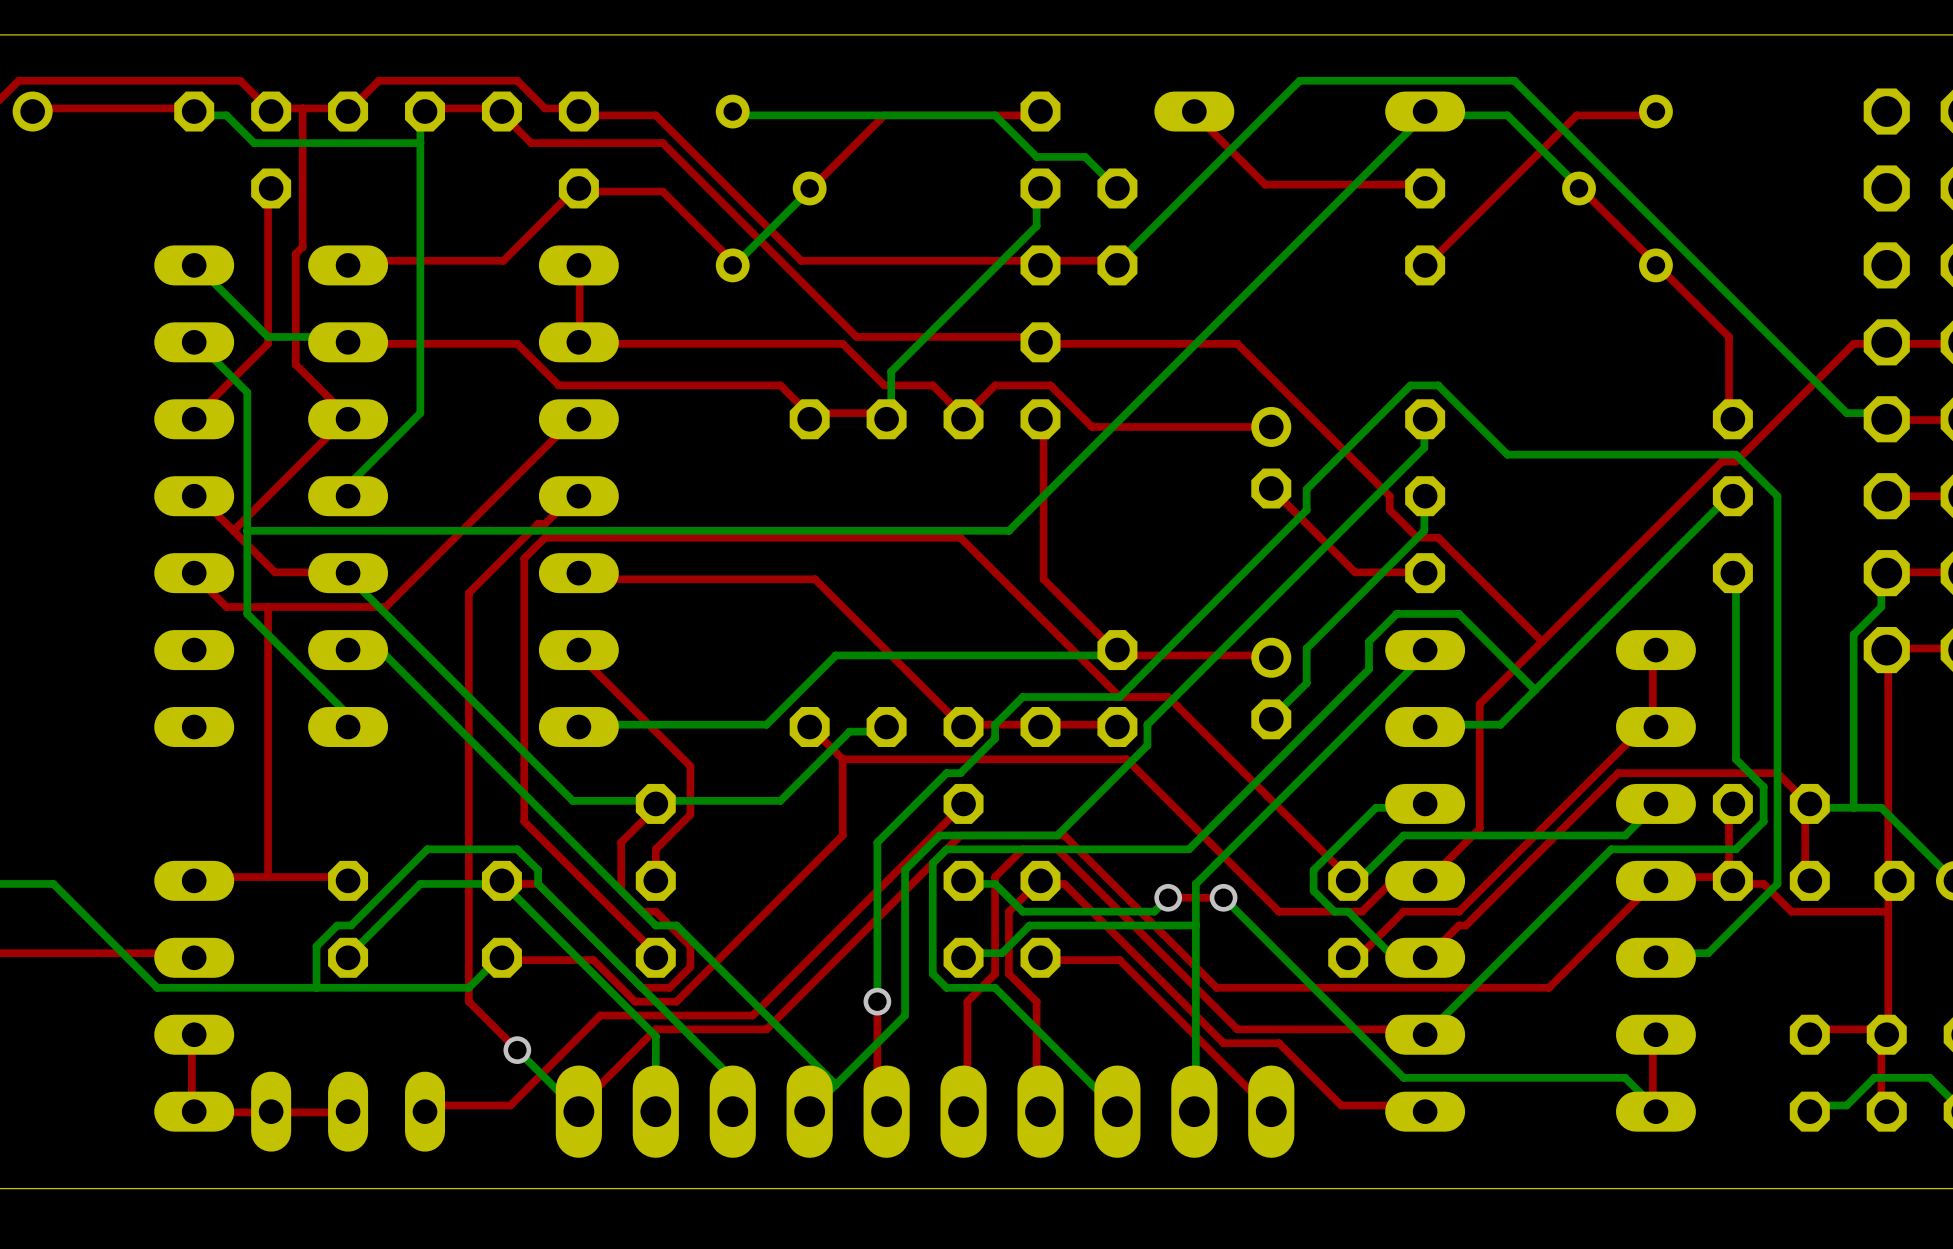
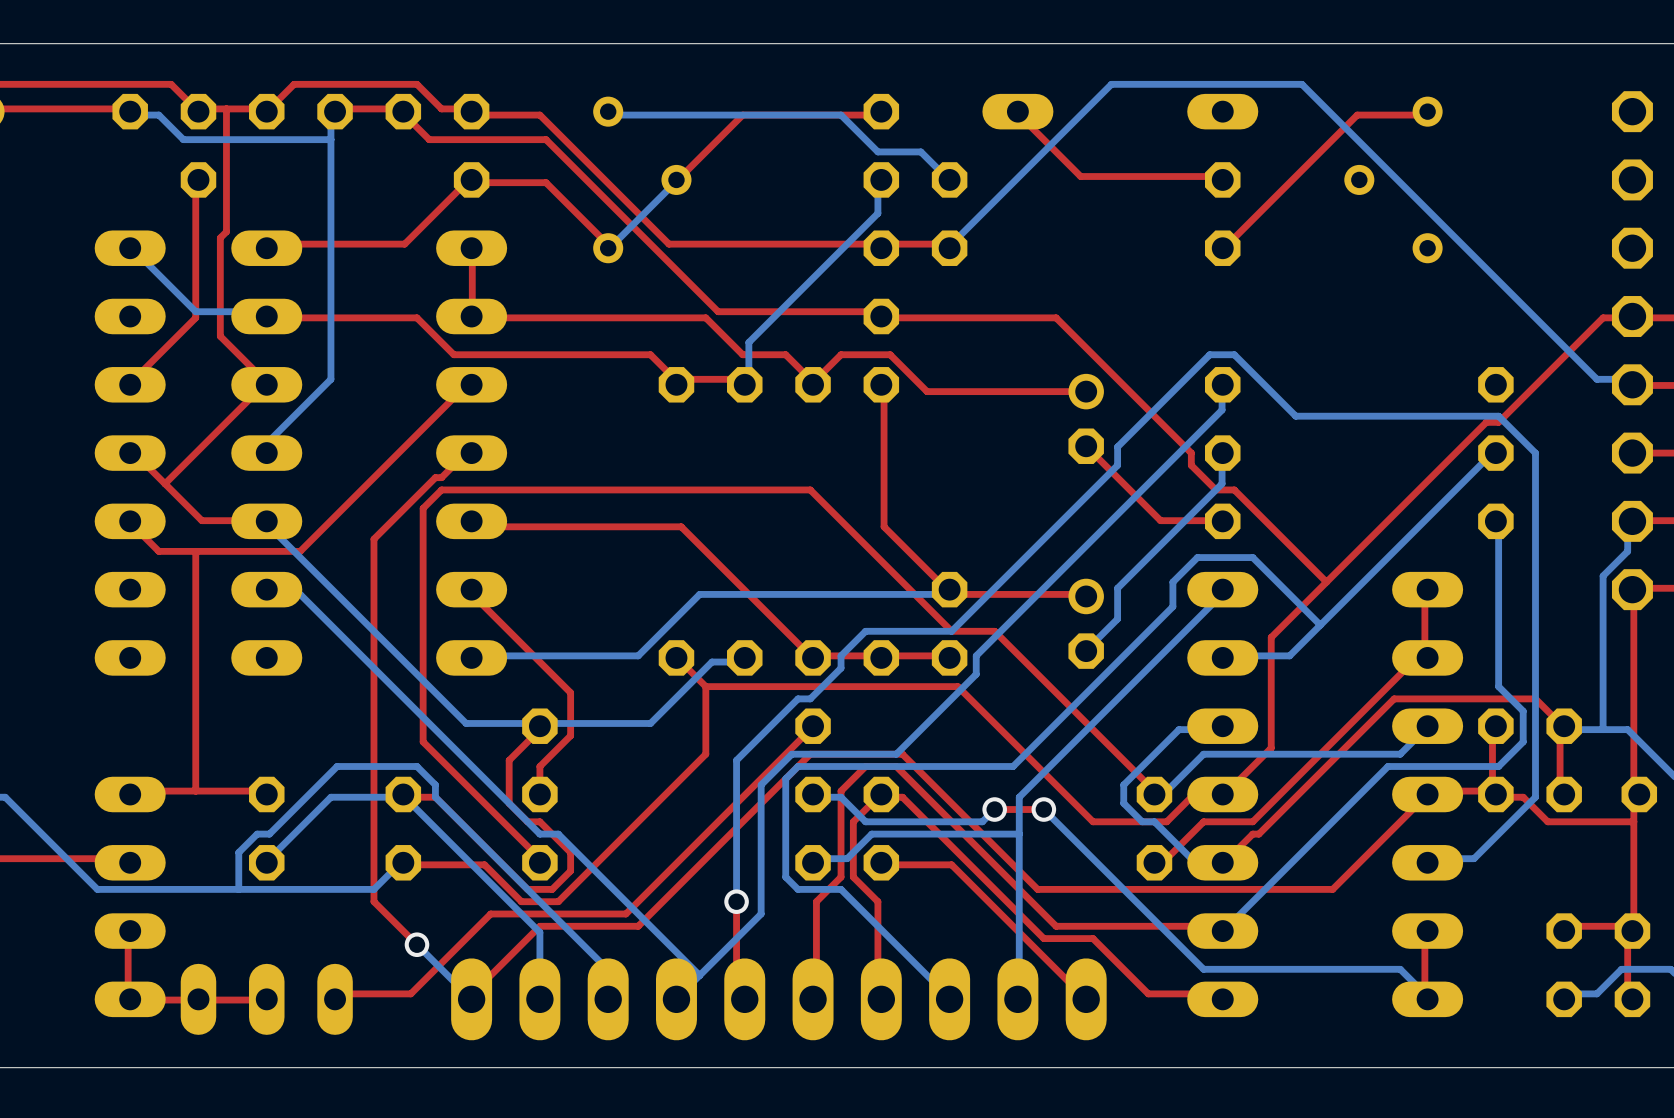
top track: (1579, 188) (1729, 336) (1729, 413) (1732, 419) -> none
bottom track: (1579, 188) (1507, 115) (1431, 115) (1425, 111) (1424, 115) (1008, 530) (247, 530) -> none
bottom track: (194, 342) (198, 343) (247, 392) (247, 613) (344, 710) (344, 724) (348, 727) -> none

